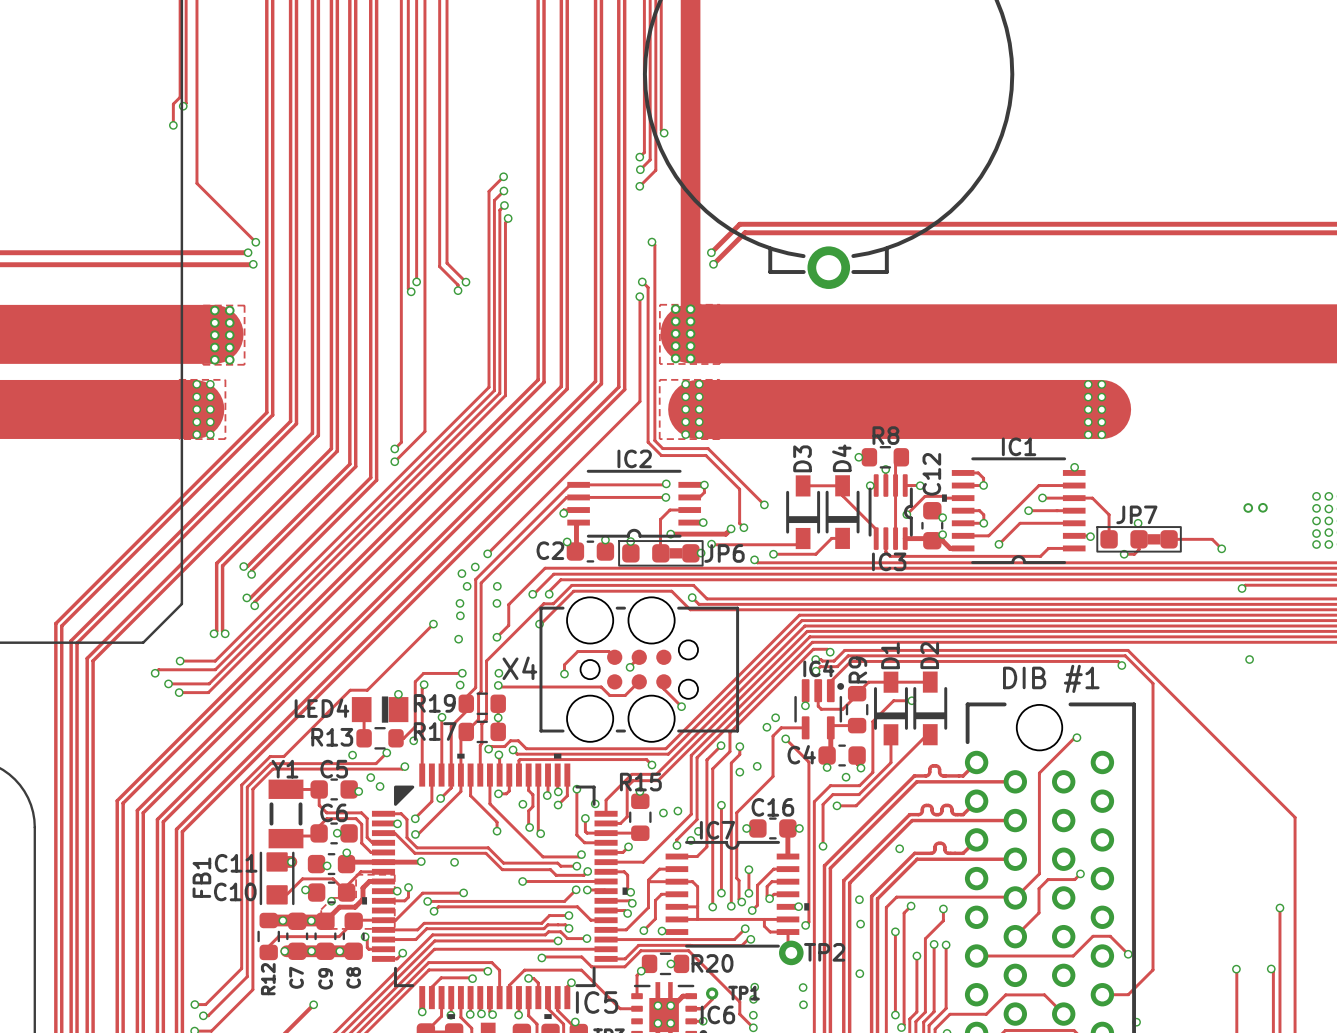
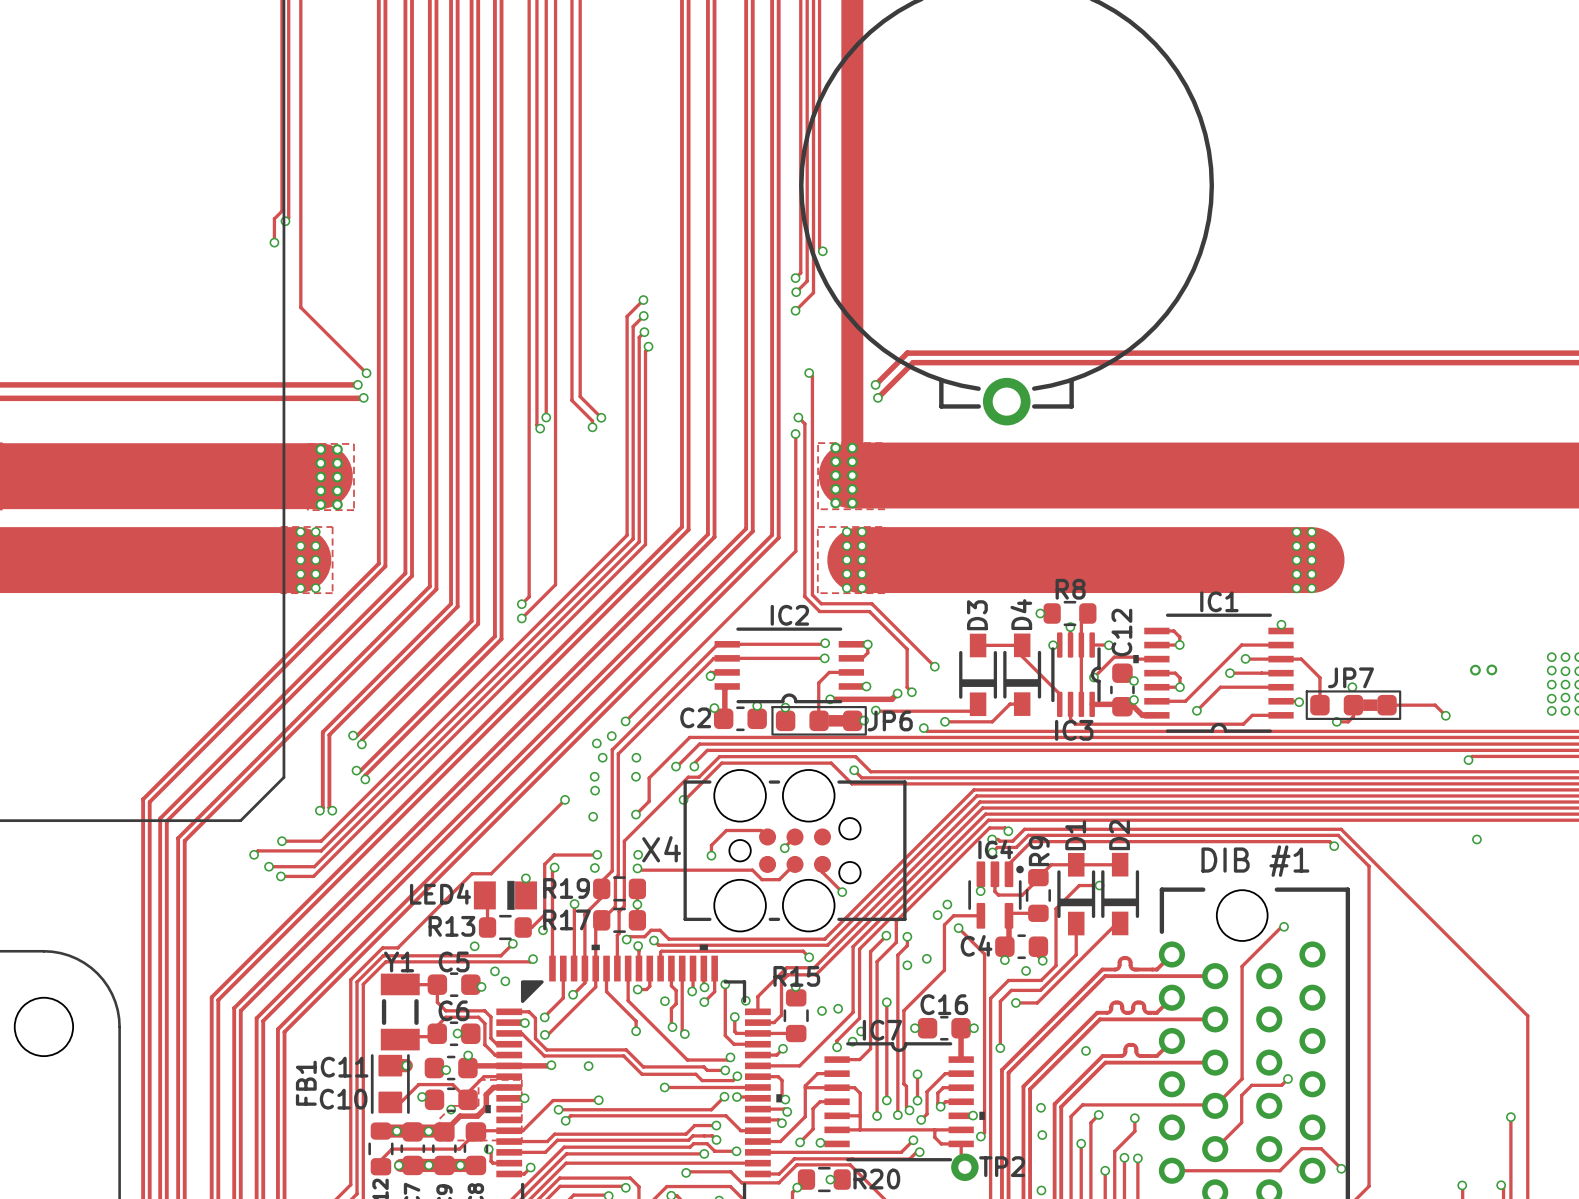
track: (408, 887) (408, 897) (404, 900) (383, 900) -> none
via: (408, 887) -> none

